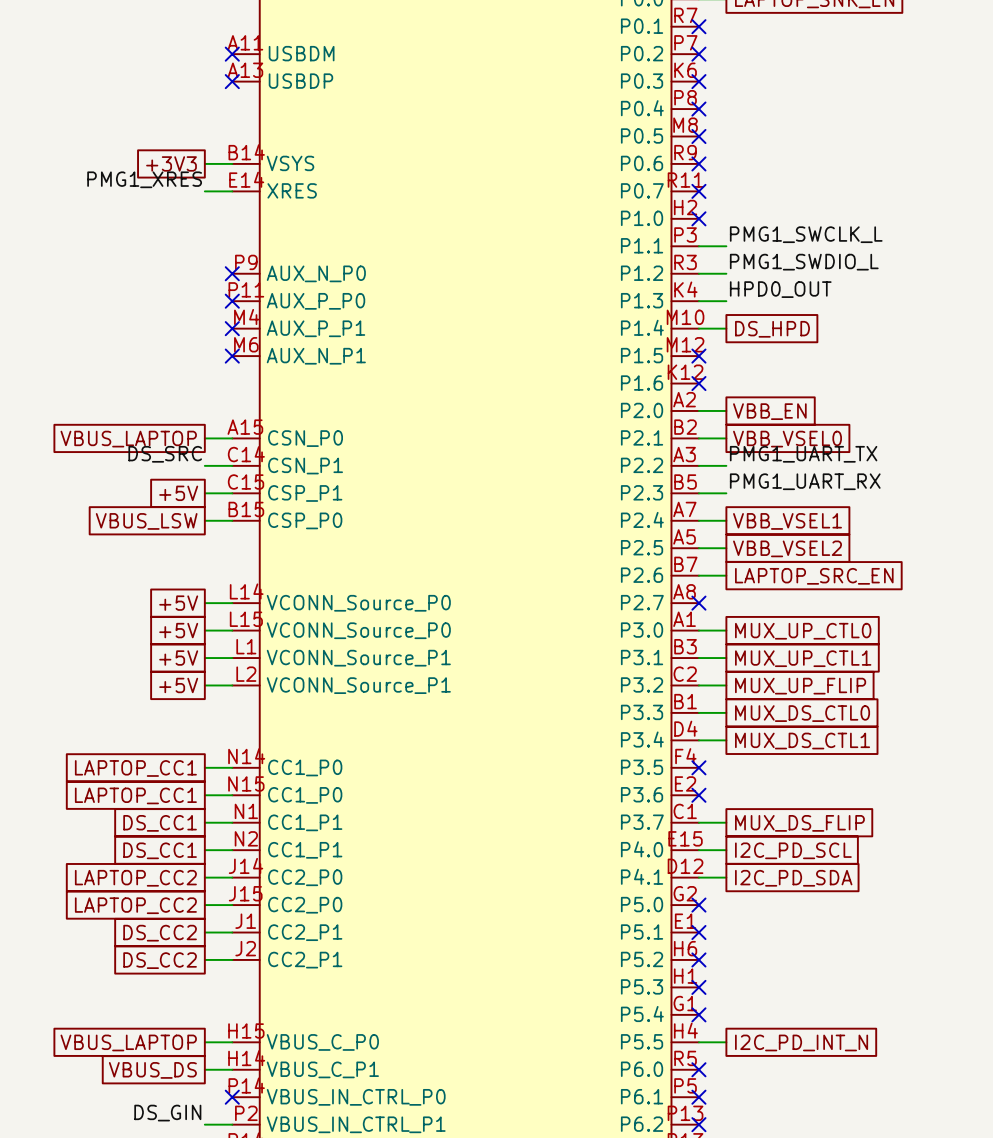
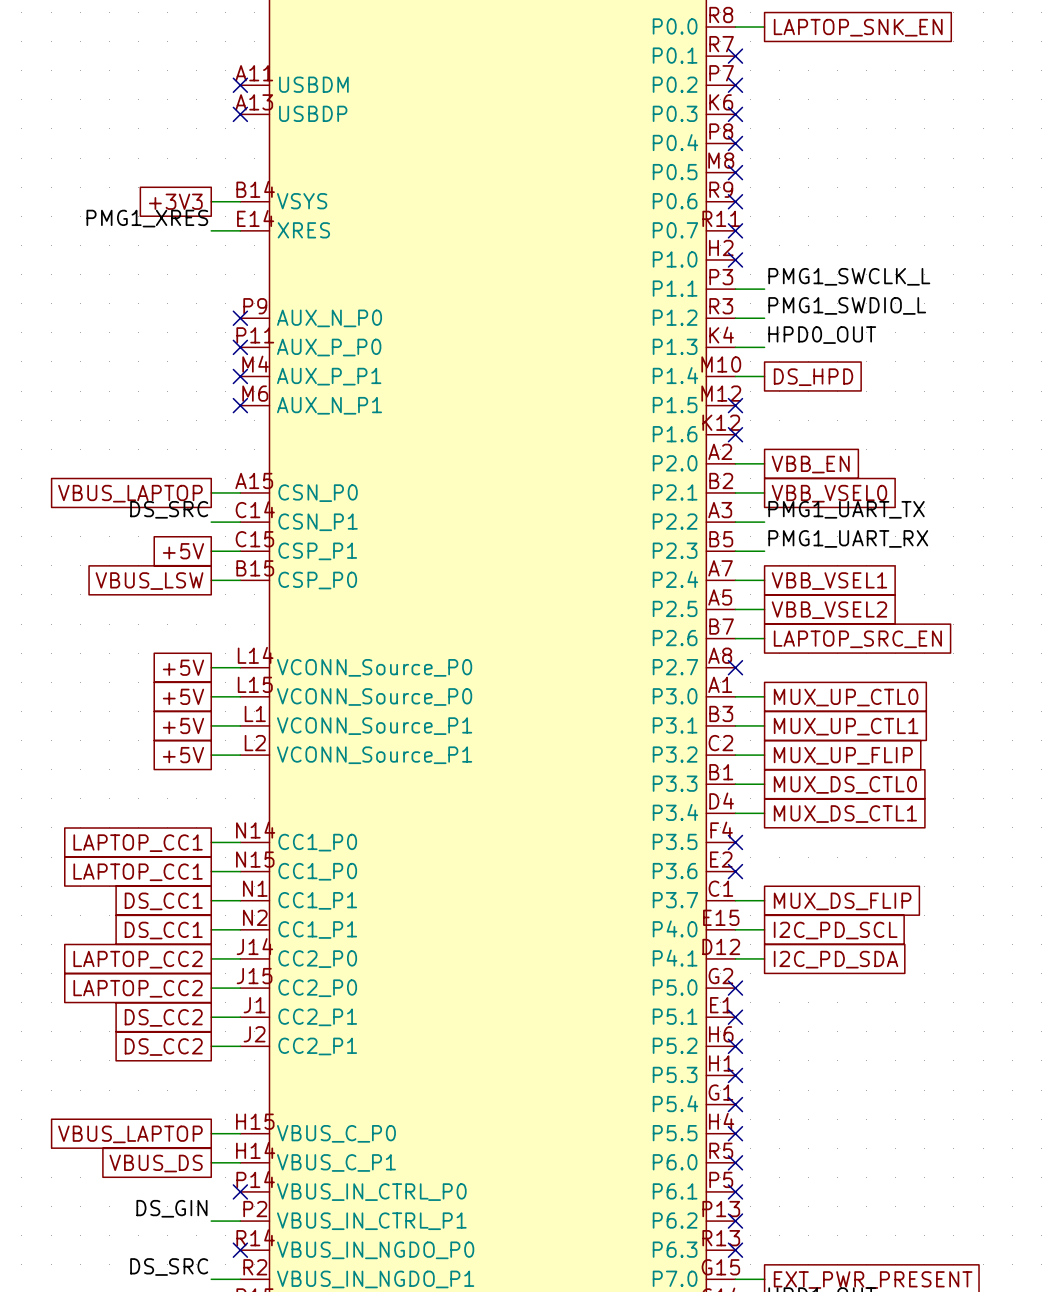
wire: (698, 1042) (726, 1042) -> none
no-connect mark: none -> (735, 1133)
global label: I2C_PD_INT_N (801, 1042) -> none

